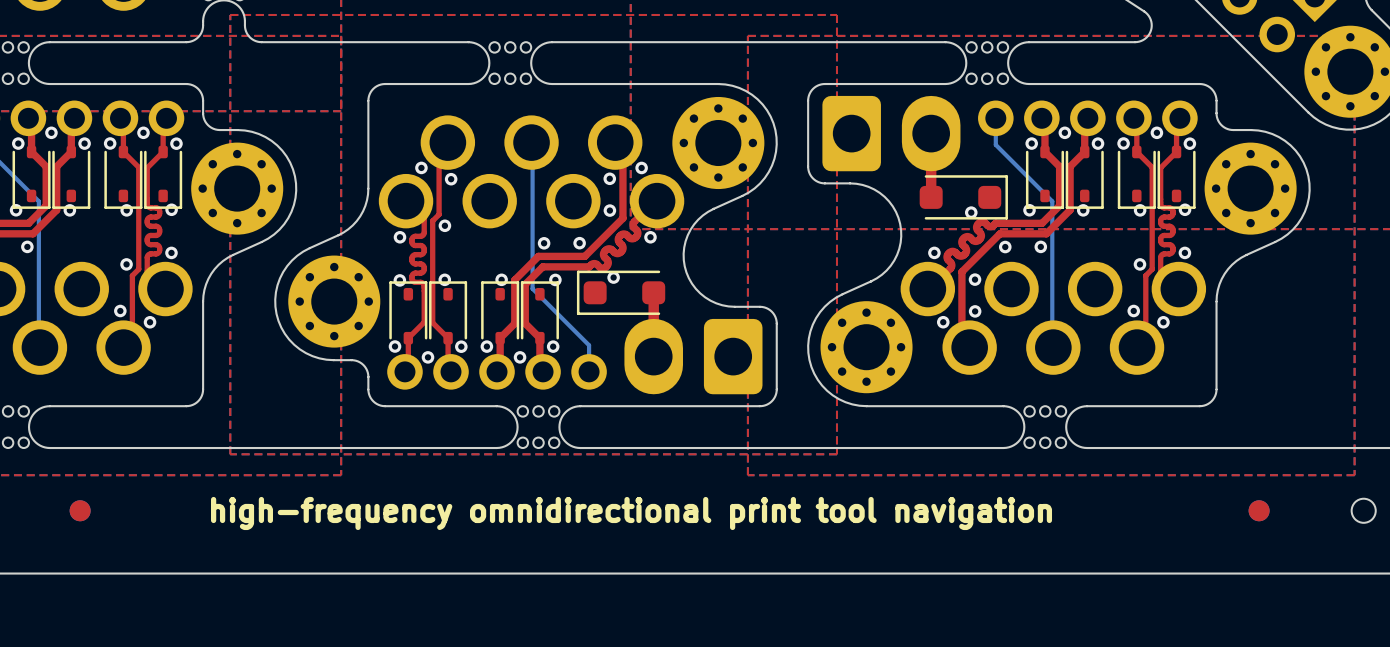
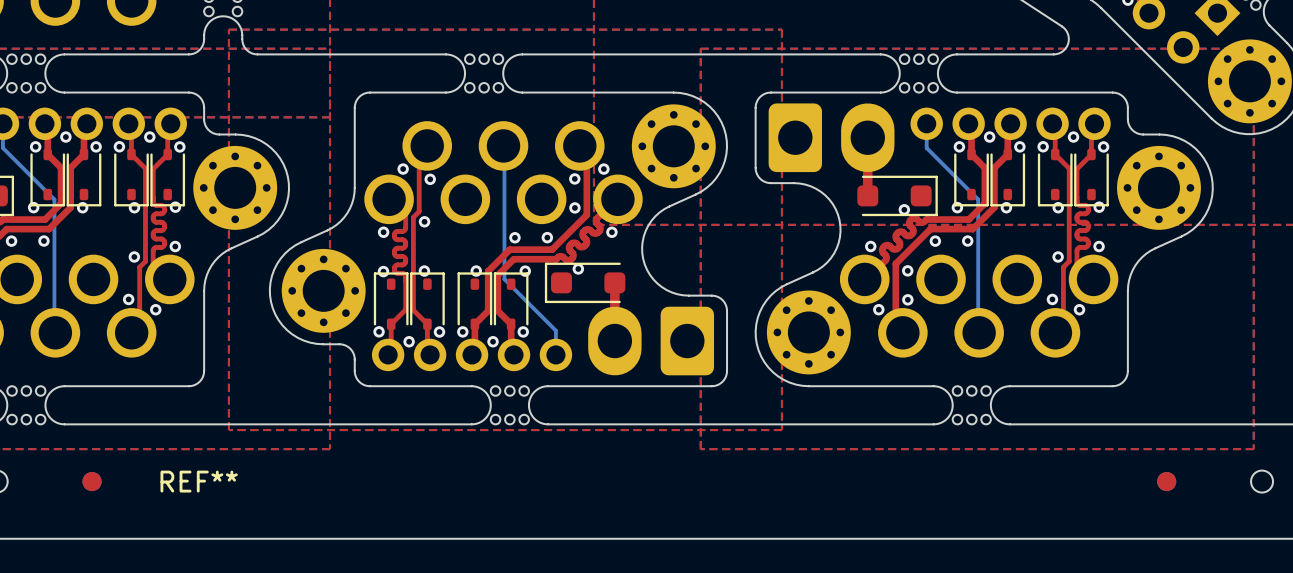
REF** name: none -> REF** (199, 481)
text: high-frequency omnidirectional print tool navigation (631, 513) -> none

